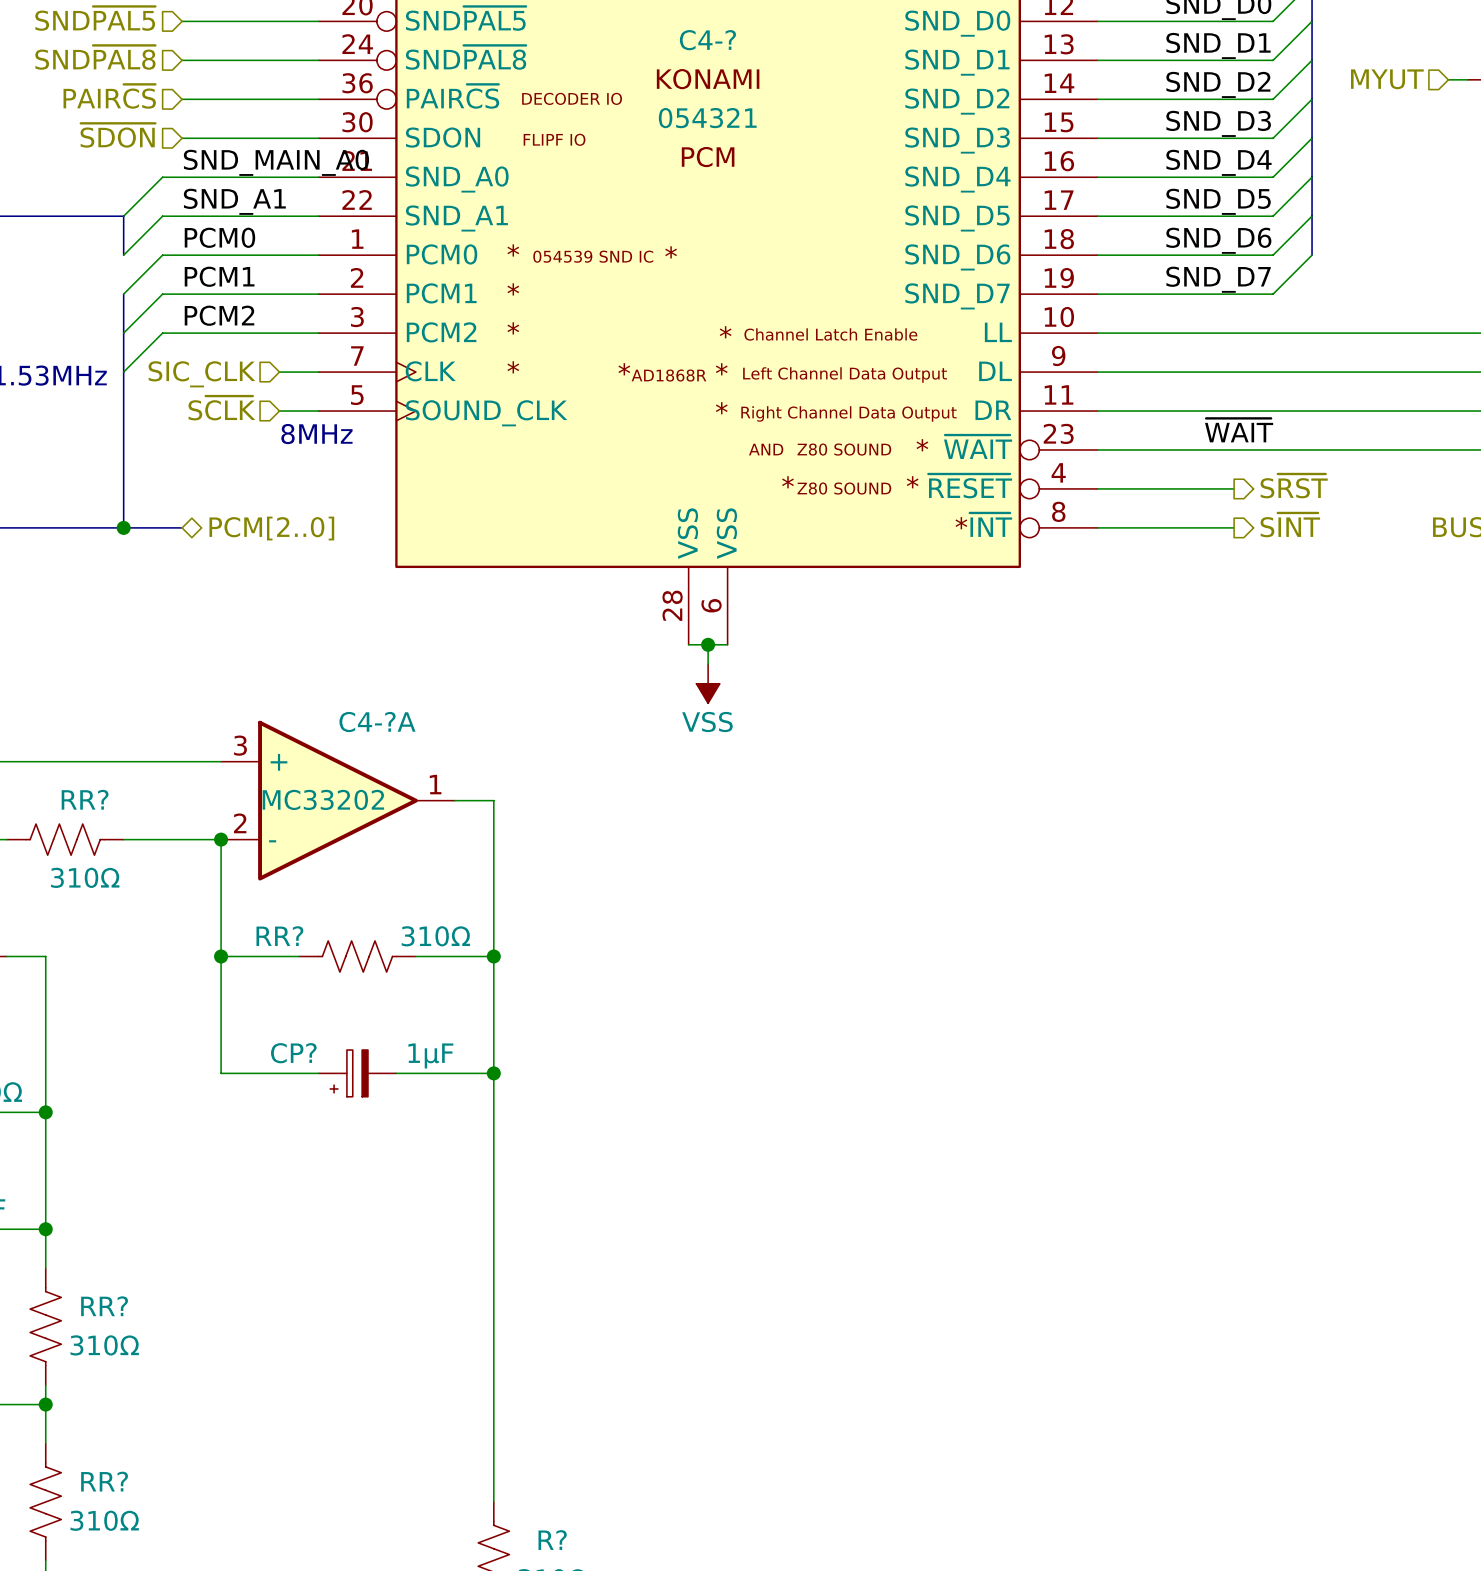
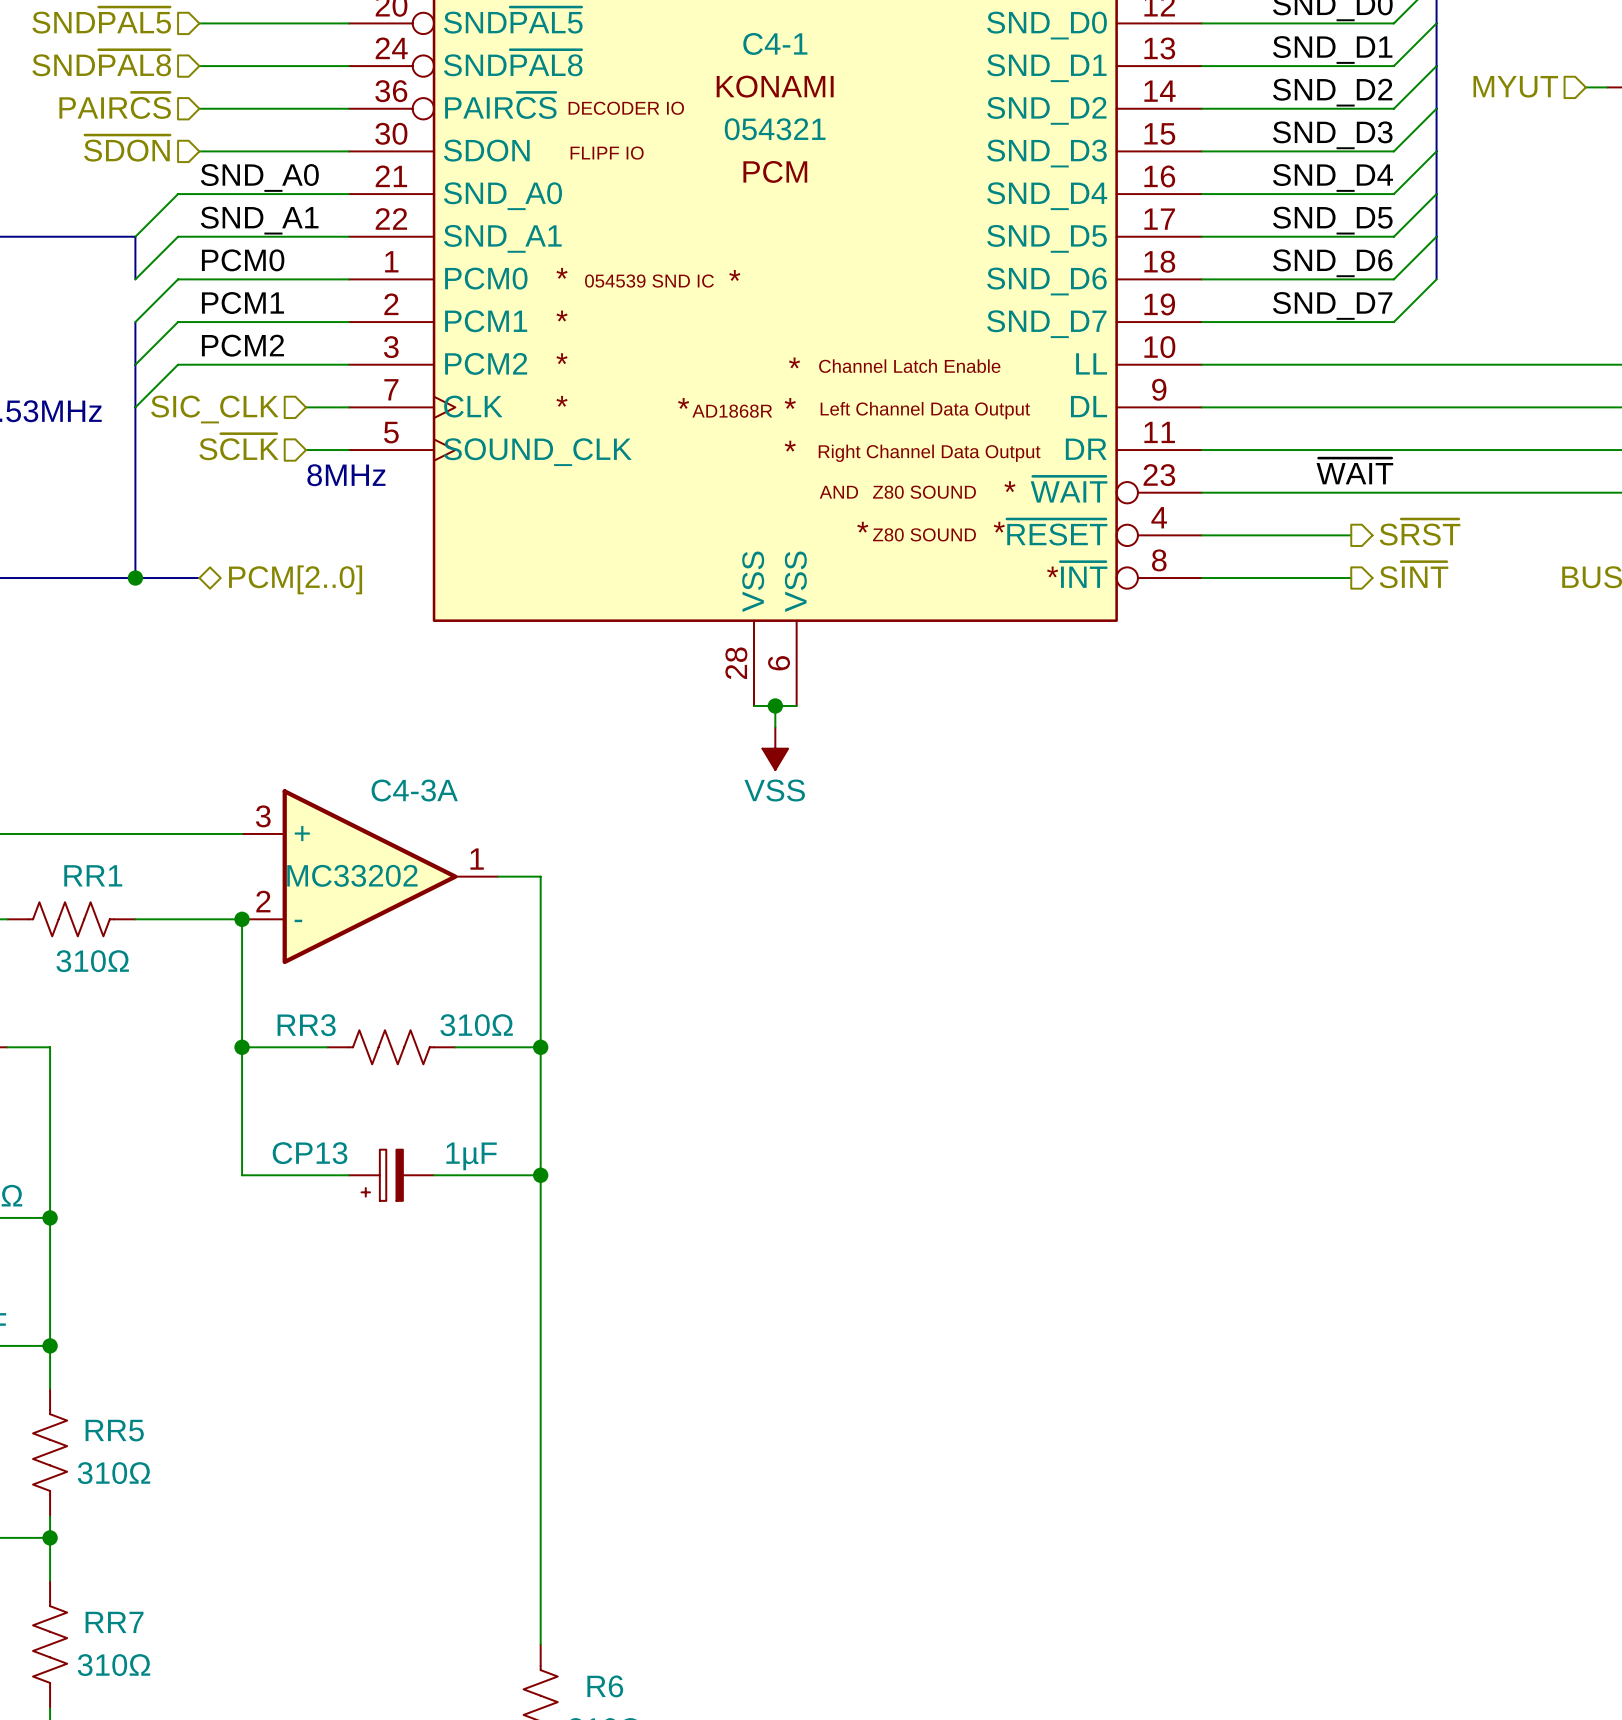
C4-? name: C4-? (707, 40) -> C4-1 (775, 43)
label: SND_MAIN_A0 (276, 162) -> SND_A0 (259, 177)
C4-?A name: C4-?A (377, 722) -> C4-3A (414, 790)
RR? name: RR? (85, 799) -> RR1 (93, 875)
RR? name: RR? (279, 936) -> RR3 (306, 1025)
CP? name: CP? (293, 1053) -> CP13 (310, 1153)
RR? name: RR? (104, 1306) -> RR5 (114, 1430)
RR? name: RR? (104, 1481) -> RR7 (114, 1622)
R? name: R? (552, 1540) -> R6 (605, 1686)

